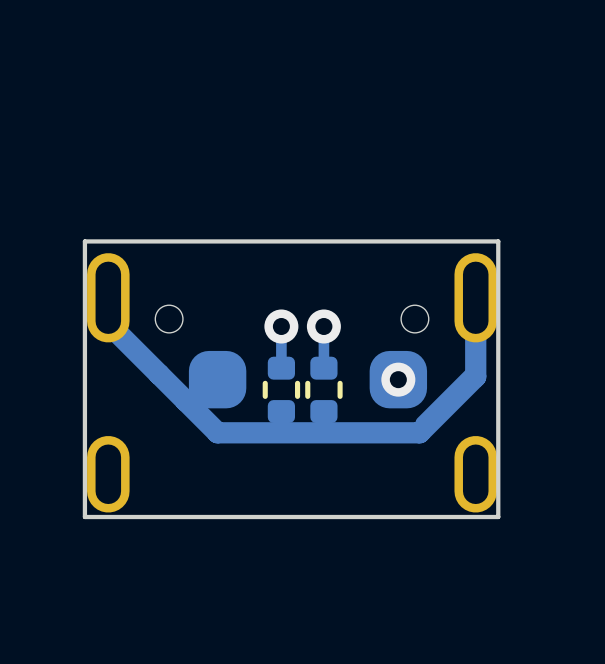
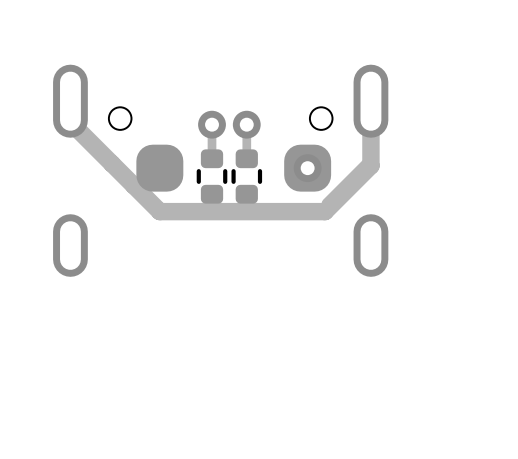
board edge: (498, 241) (84, 241) (84, 517) (498, 517) (498, 241) -> none

